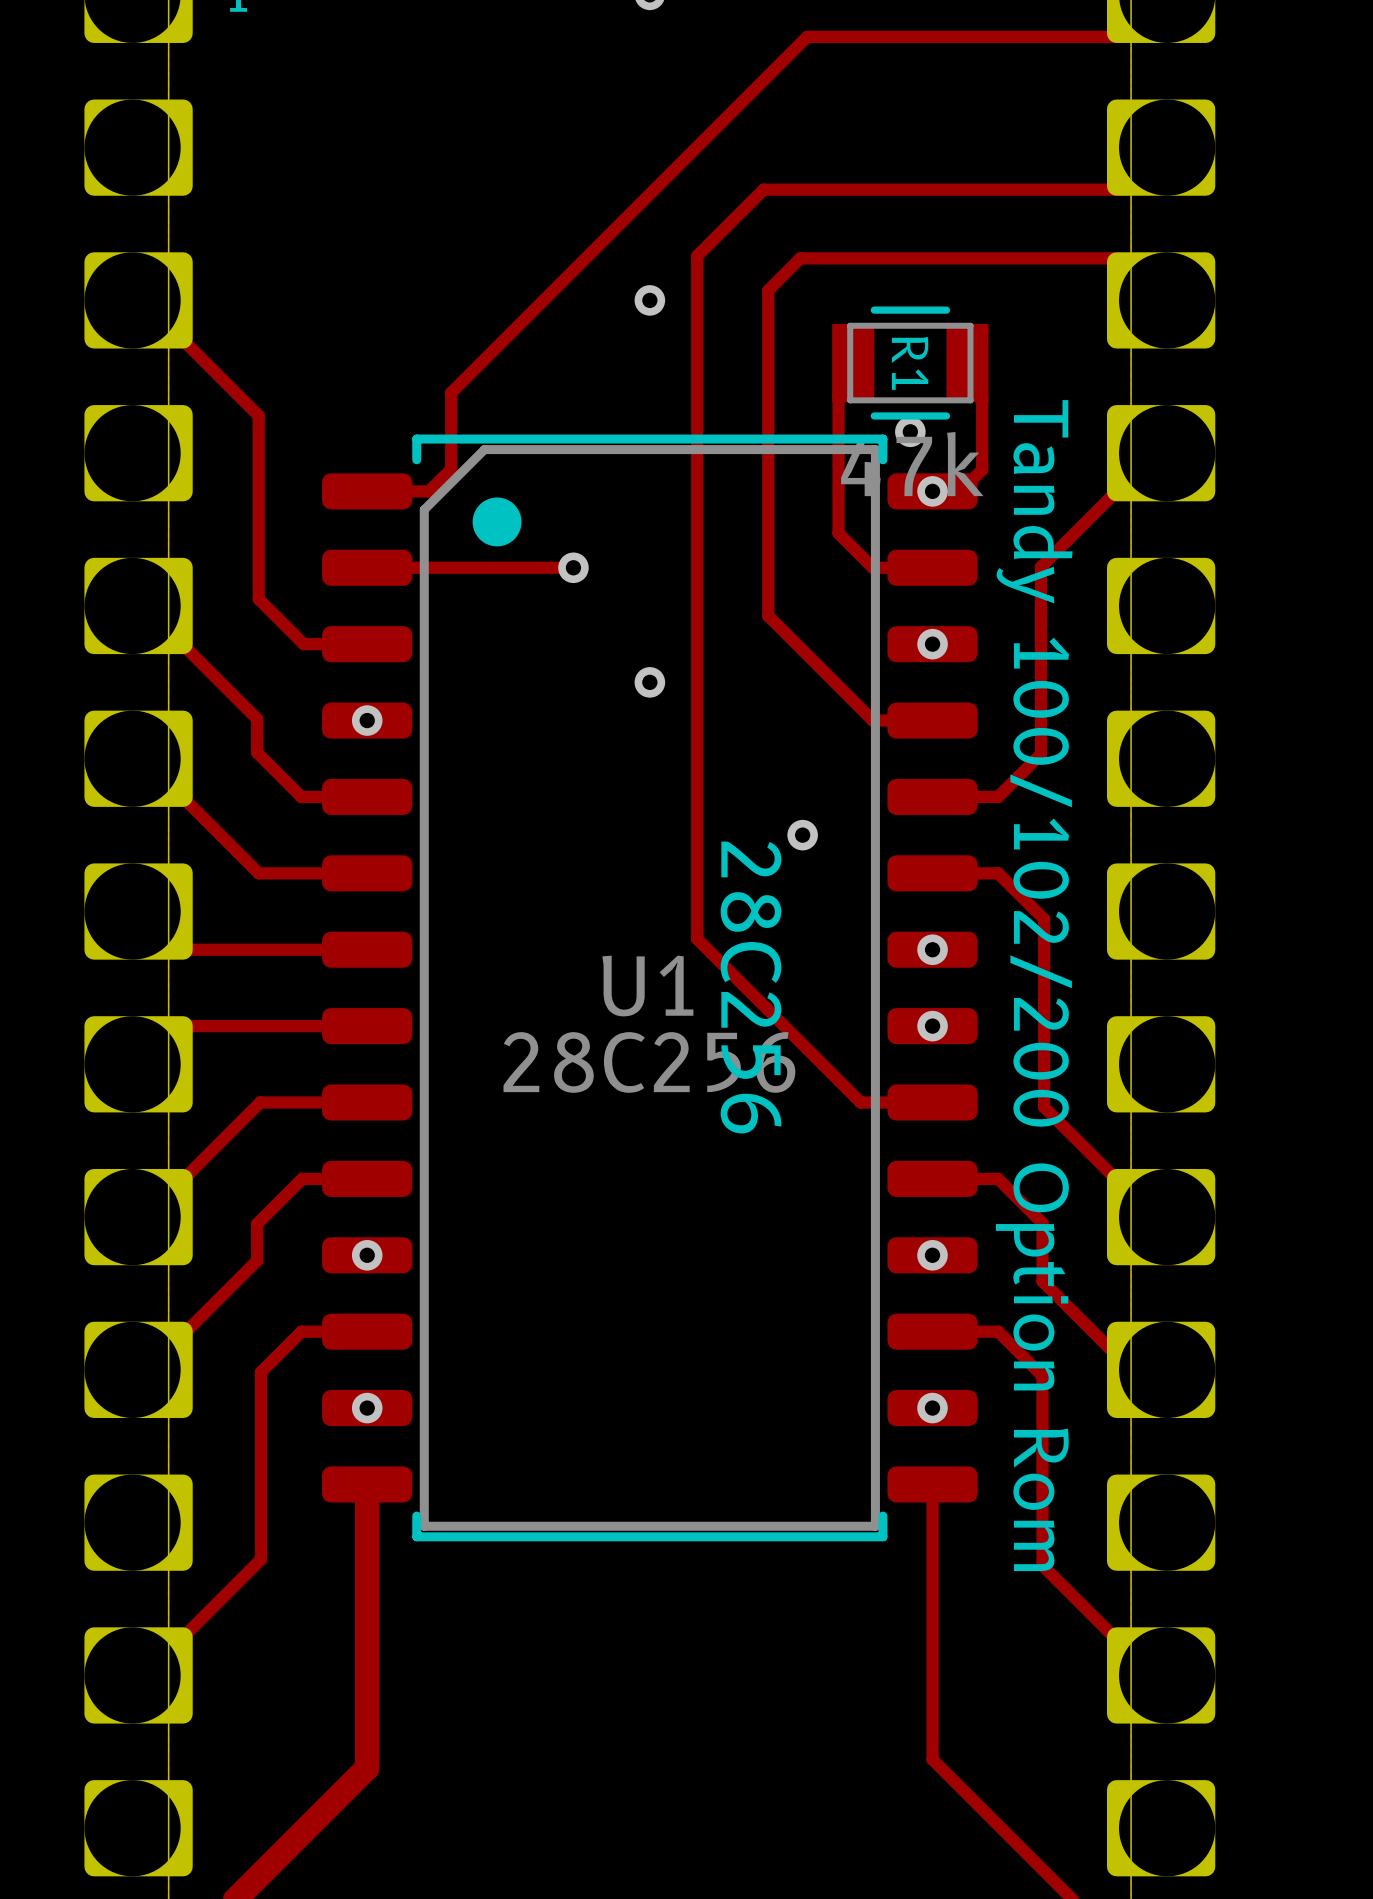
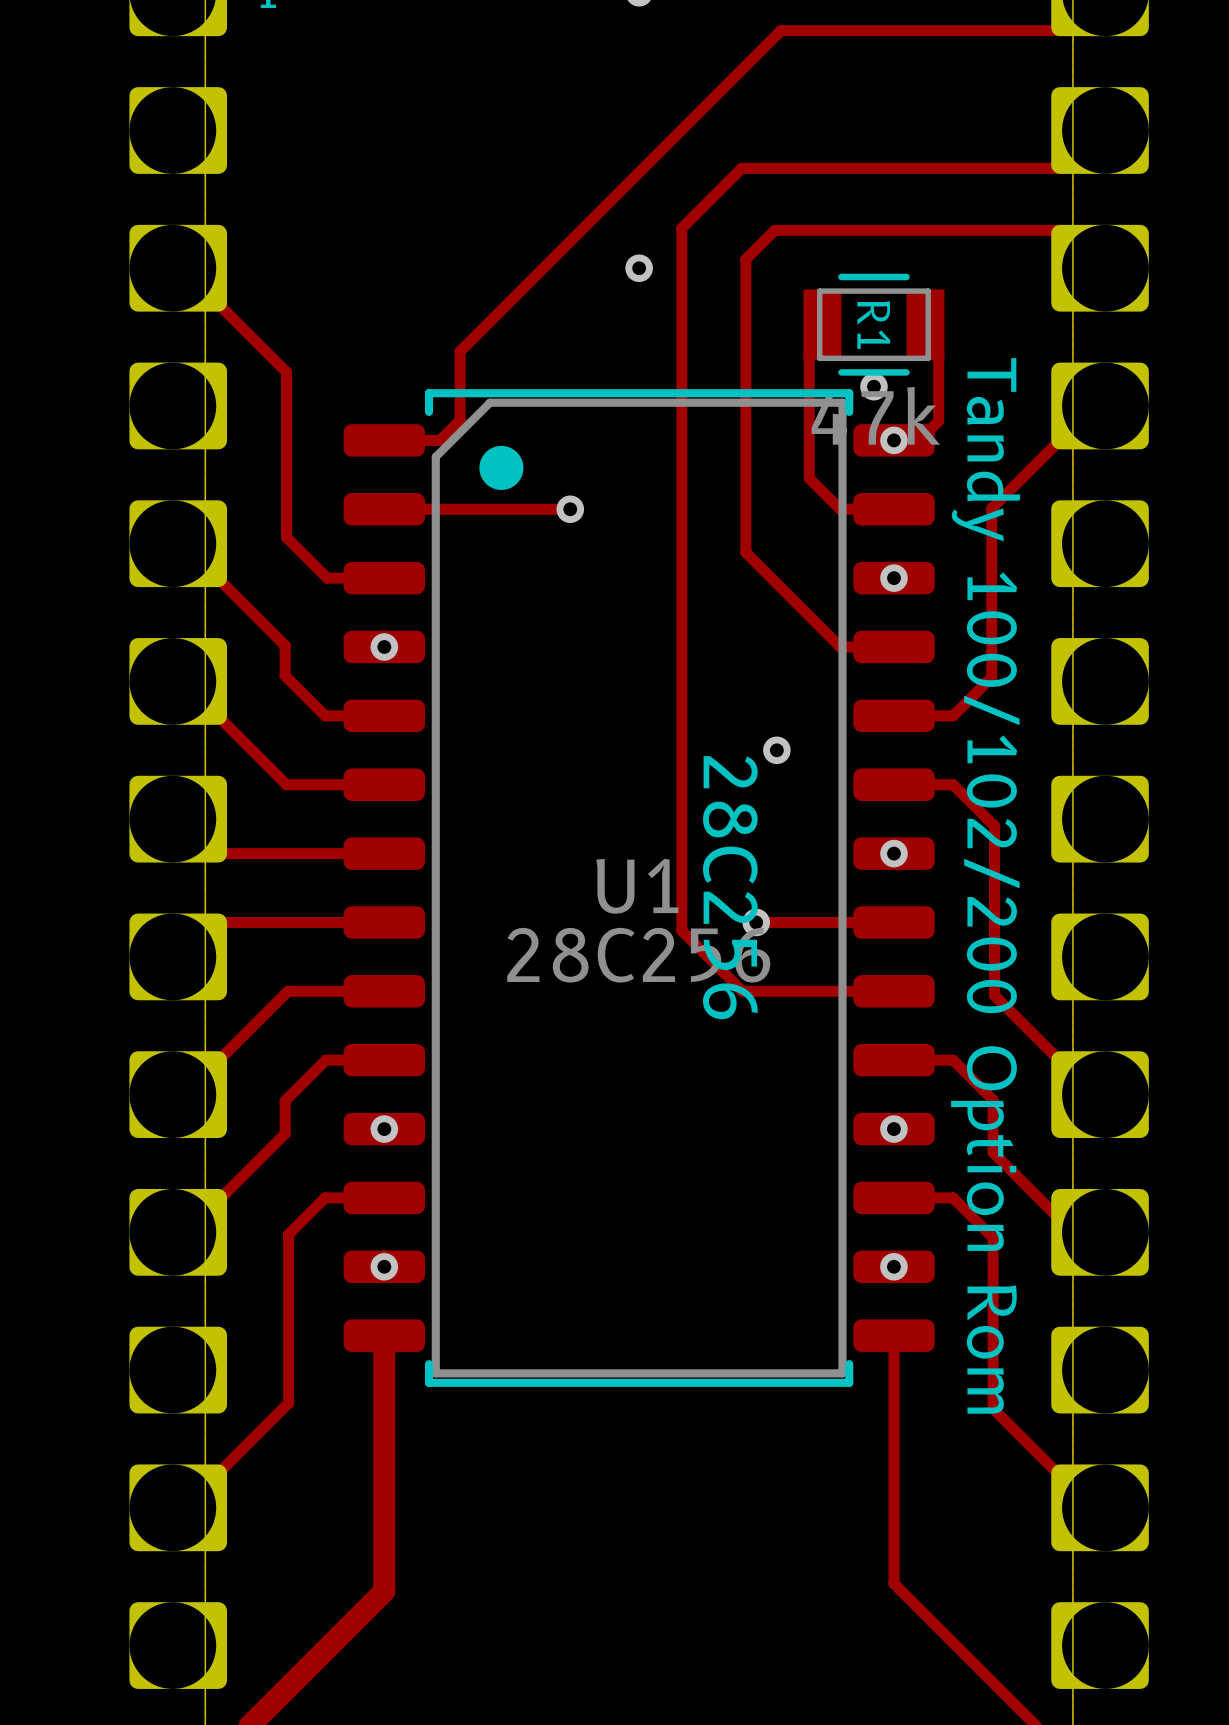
via: (649, 682) -> none
track: (697, 939) (860, 1102) -> (681, 843) (681, 930) (742, 991) (829, 991)
track: none -> (756, 922) (894, 922)
via position: (932, 1026) -> (756, 922)

